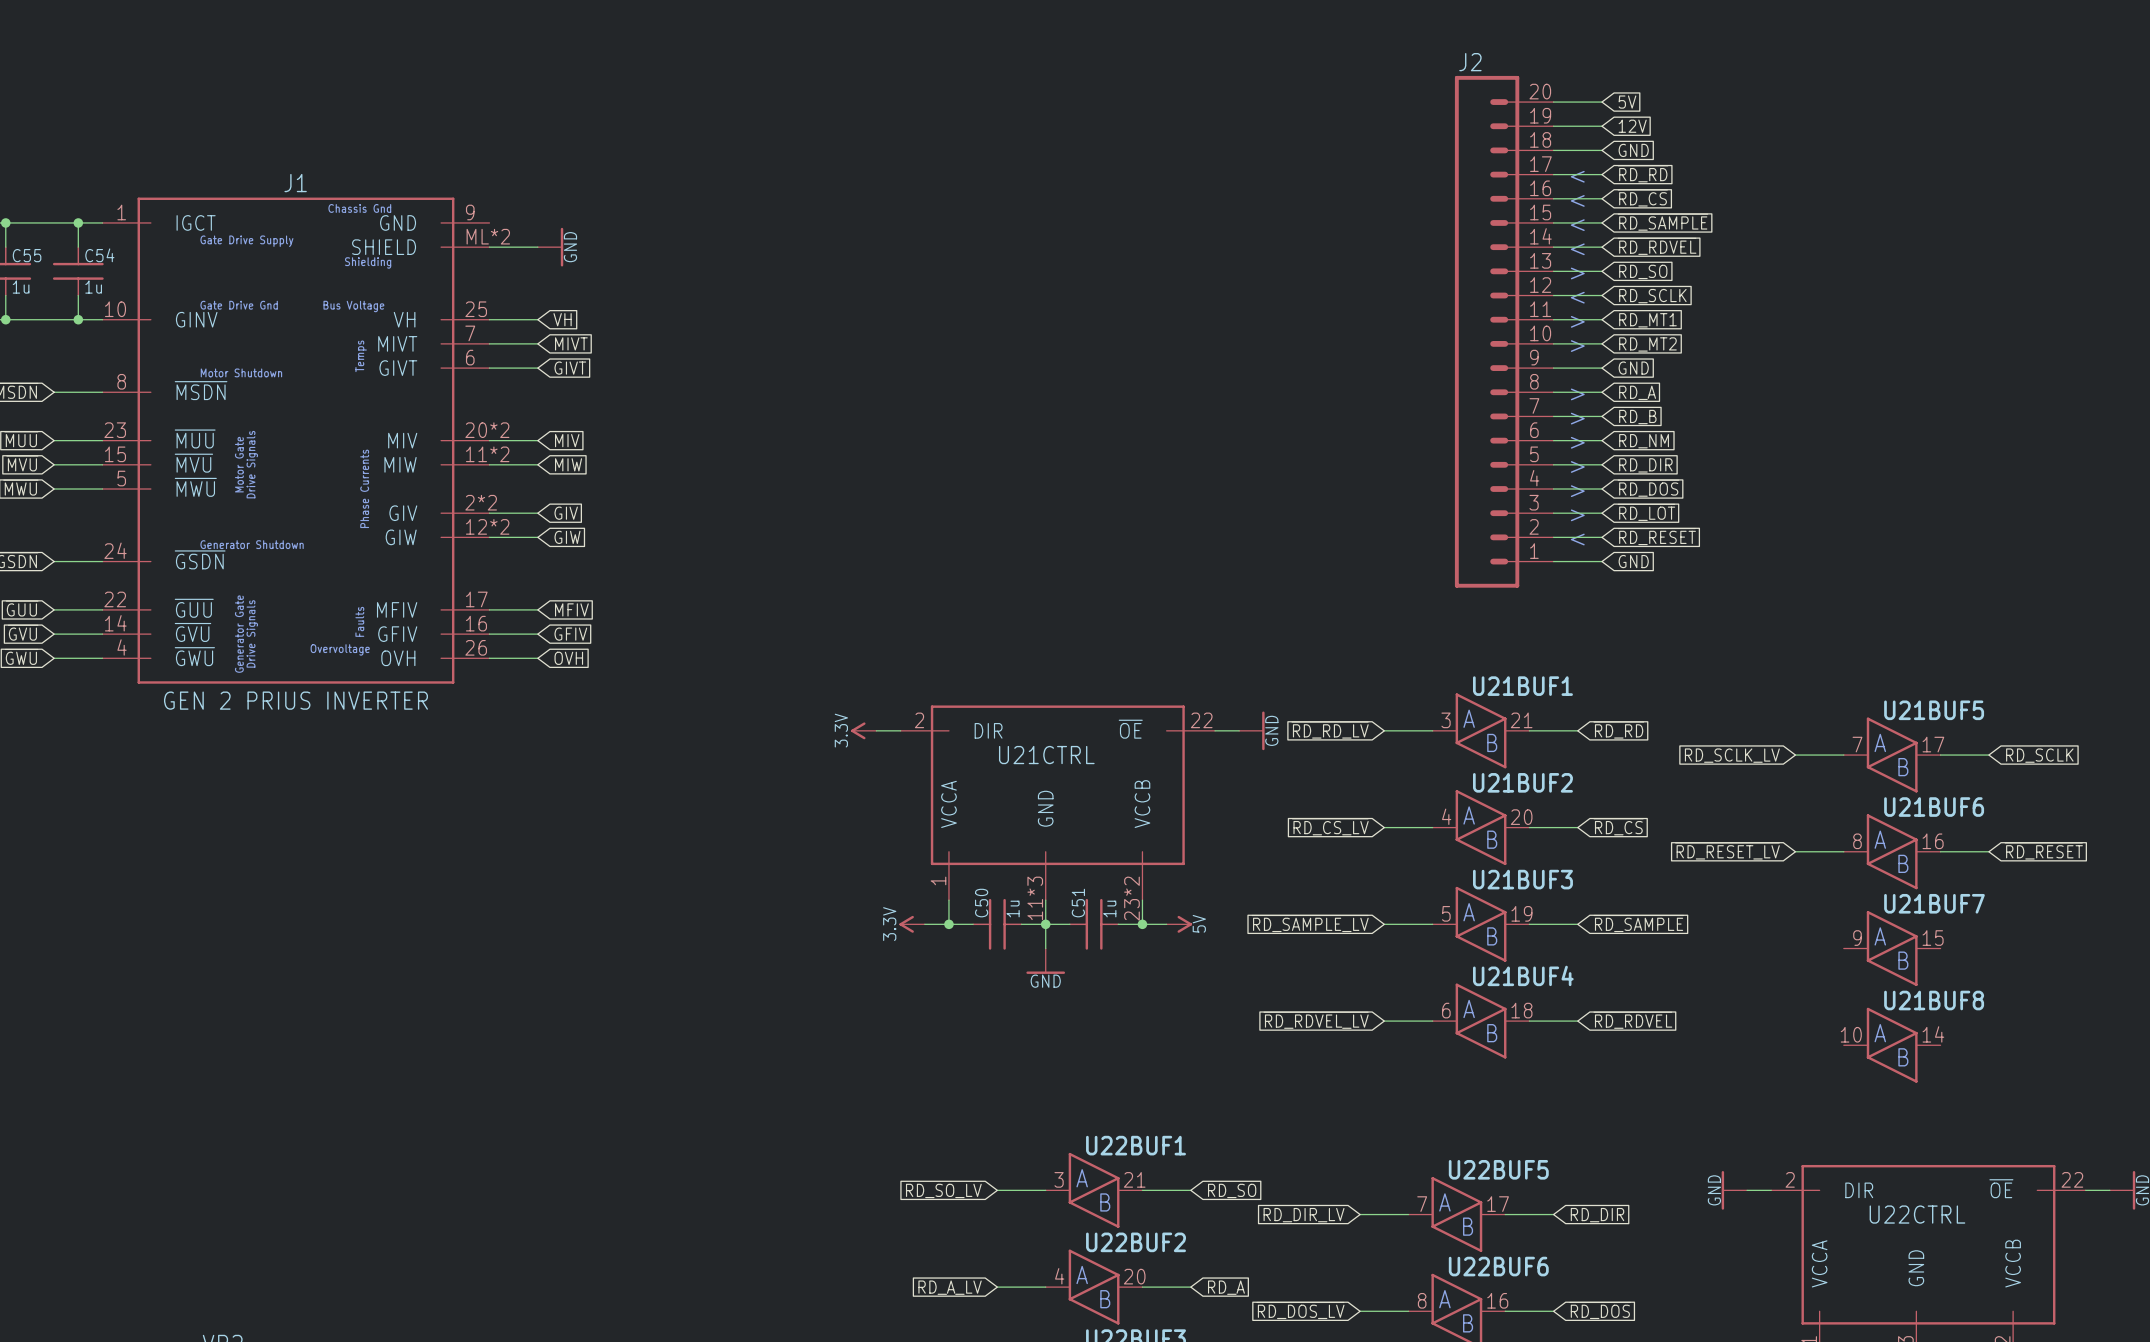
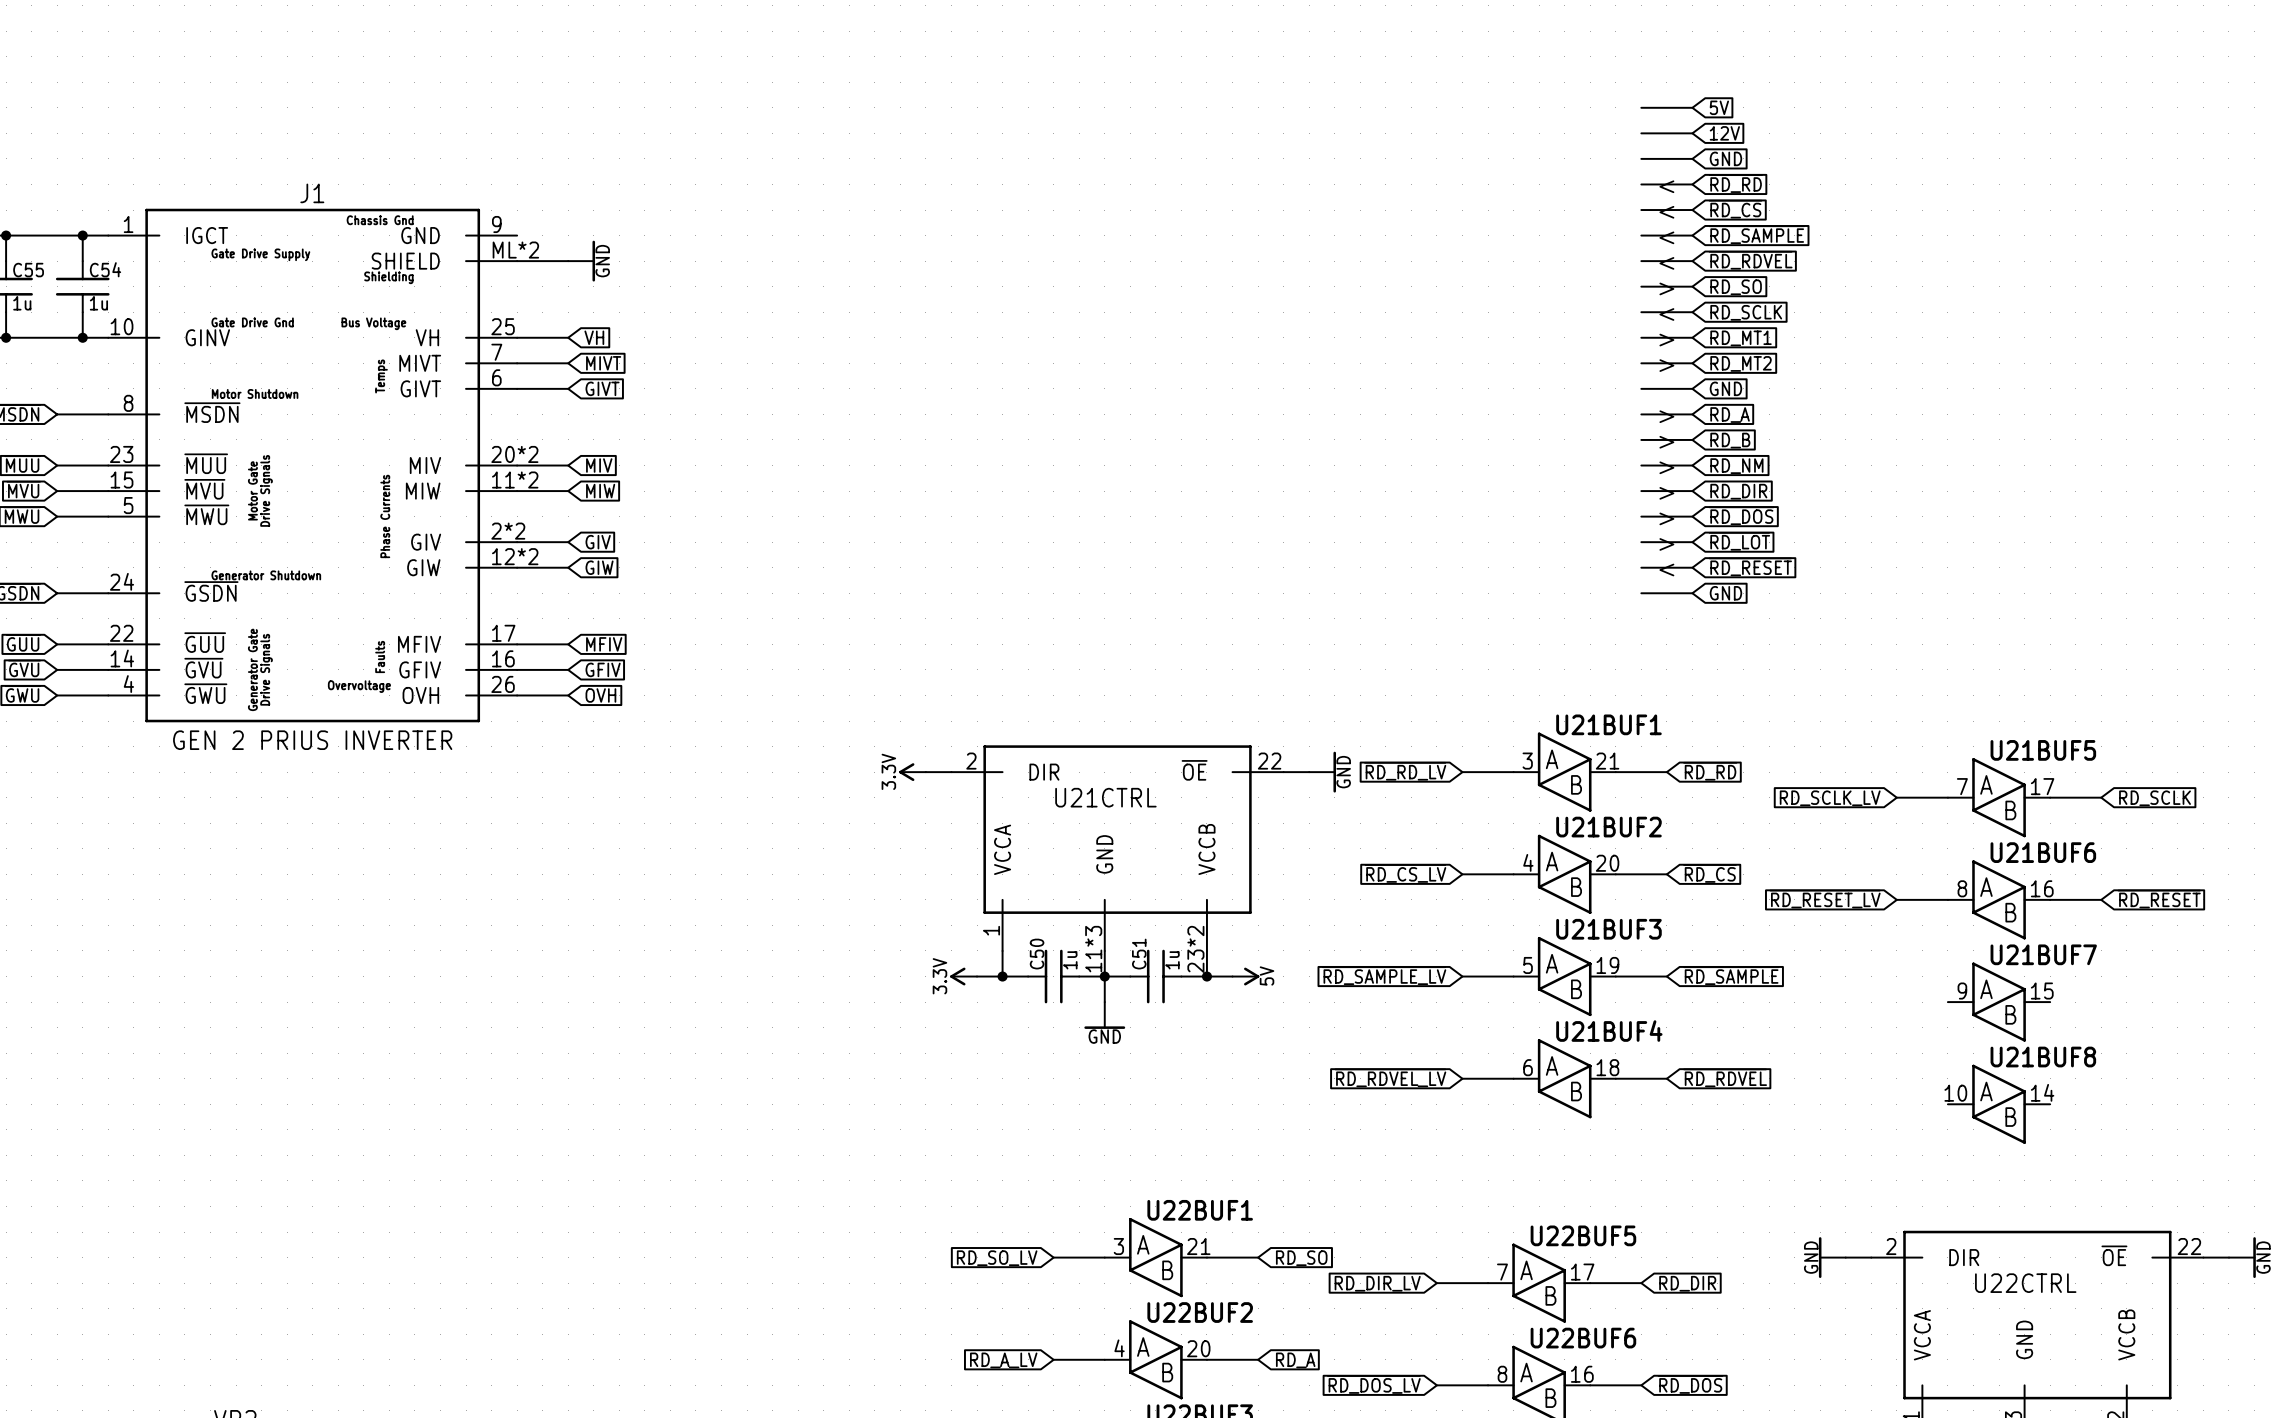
J2: (1504, 331) -> none

